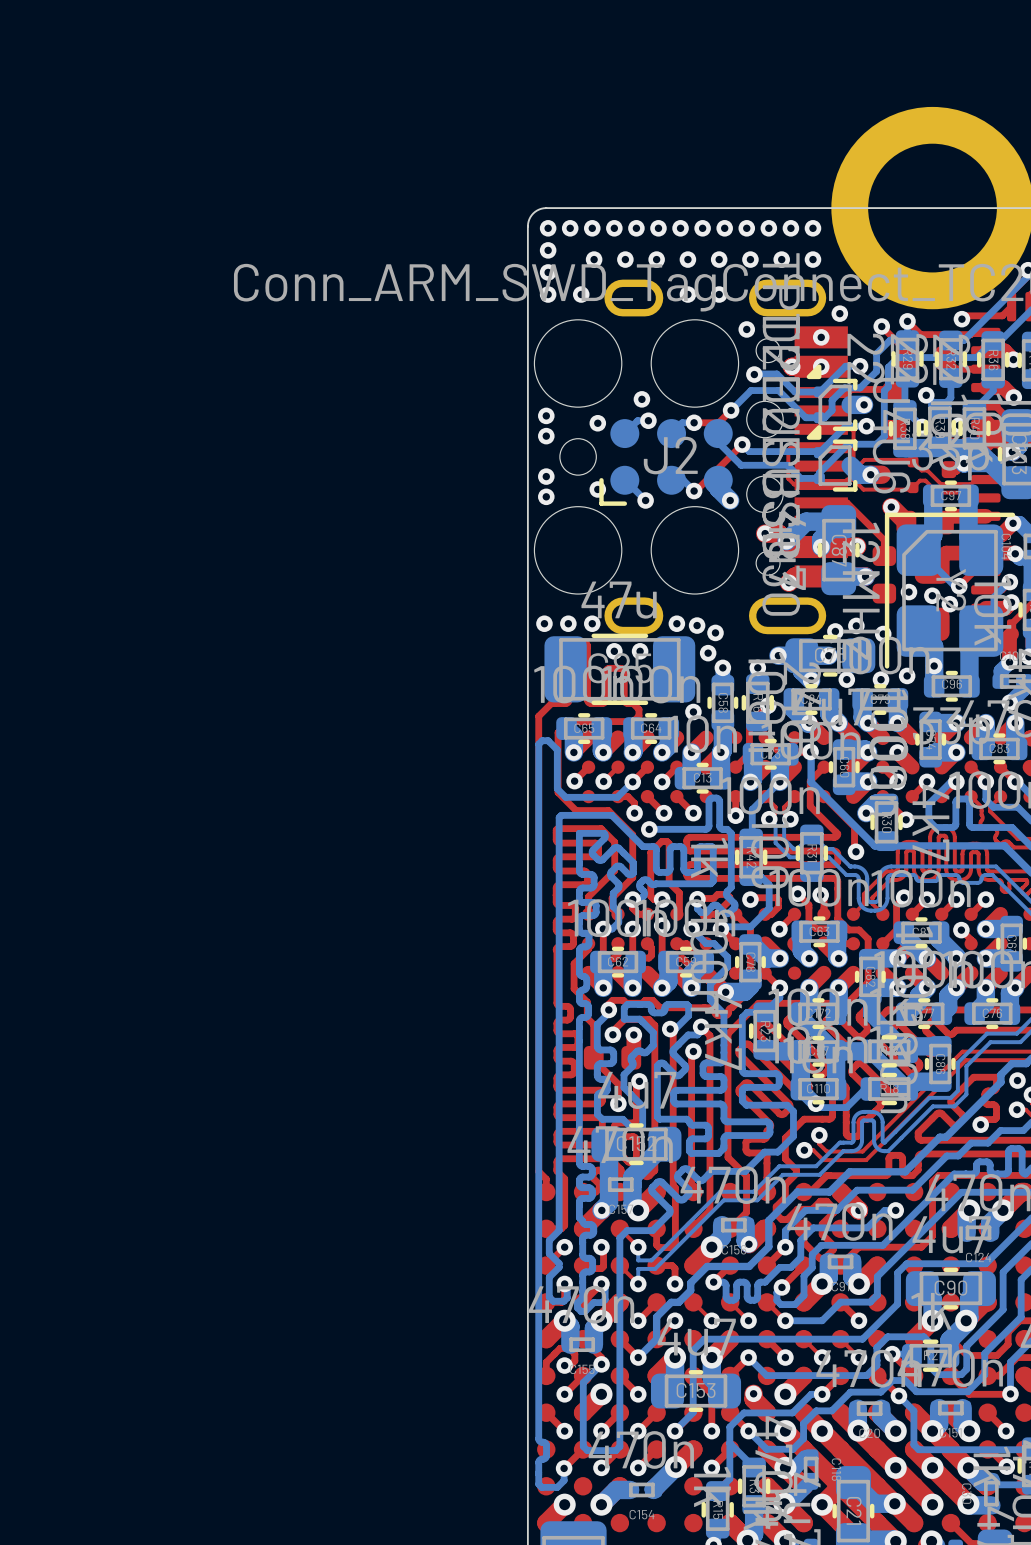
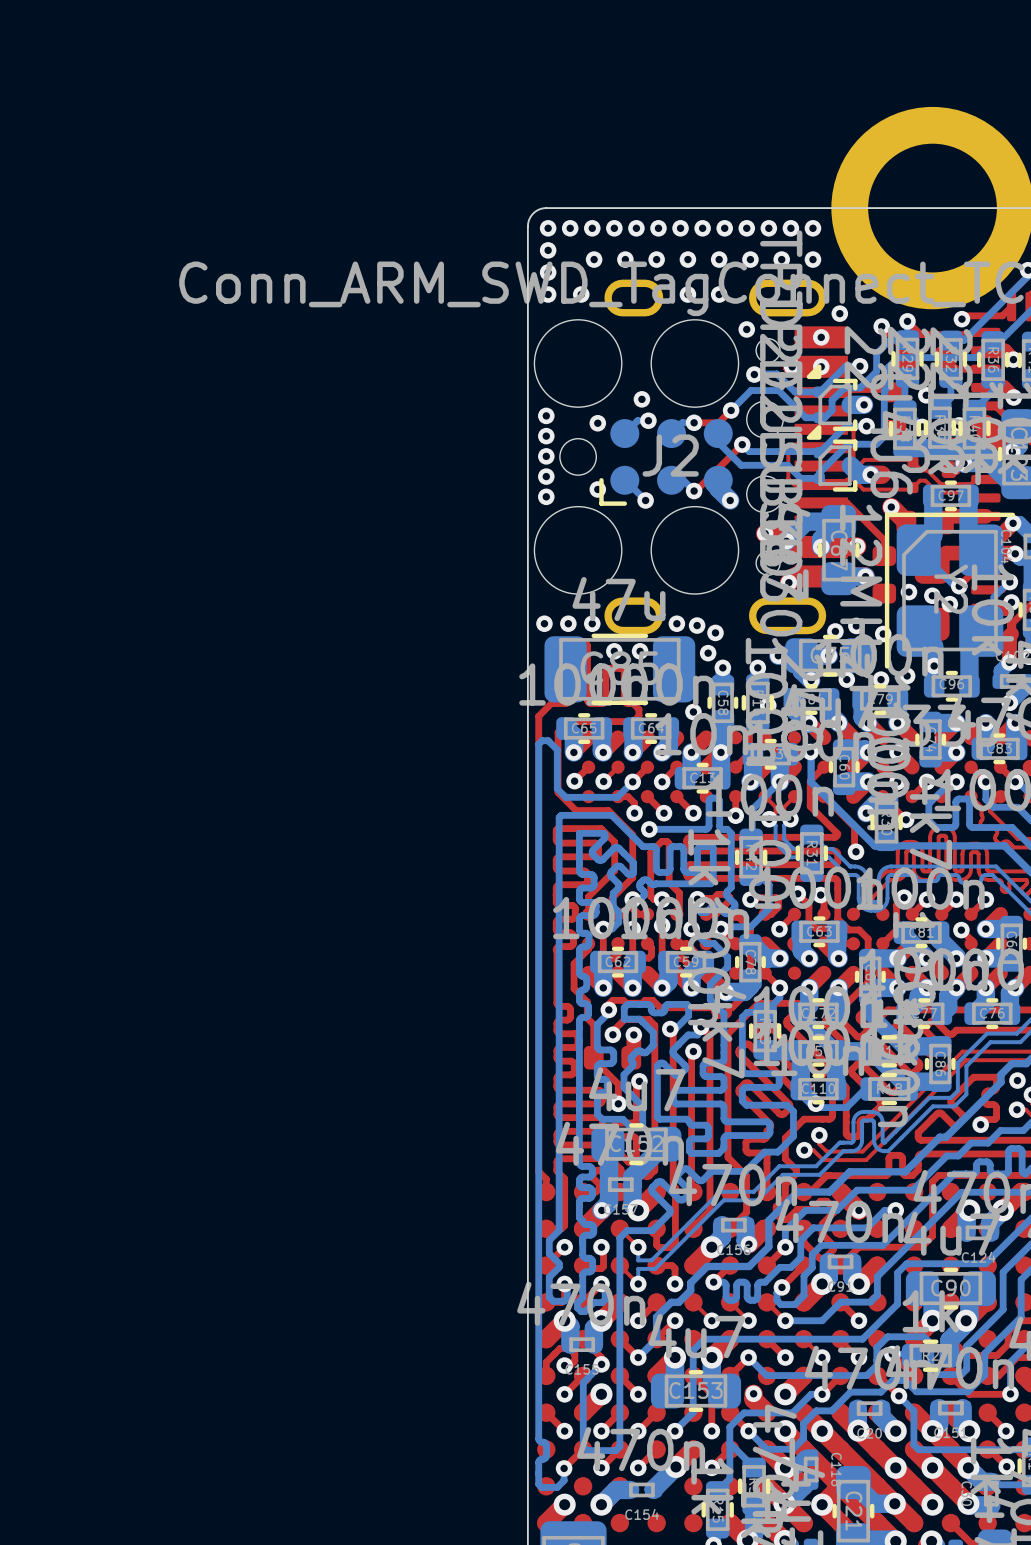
via: none -> (546, 456)

